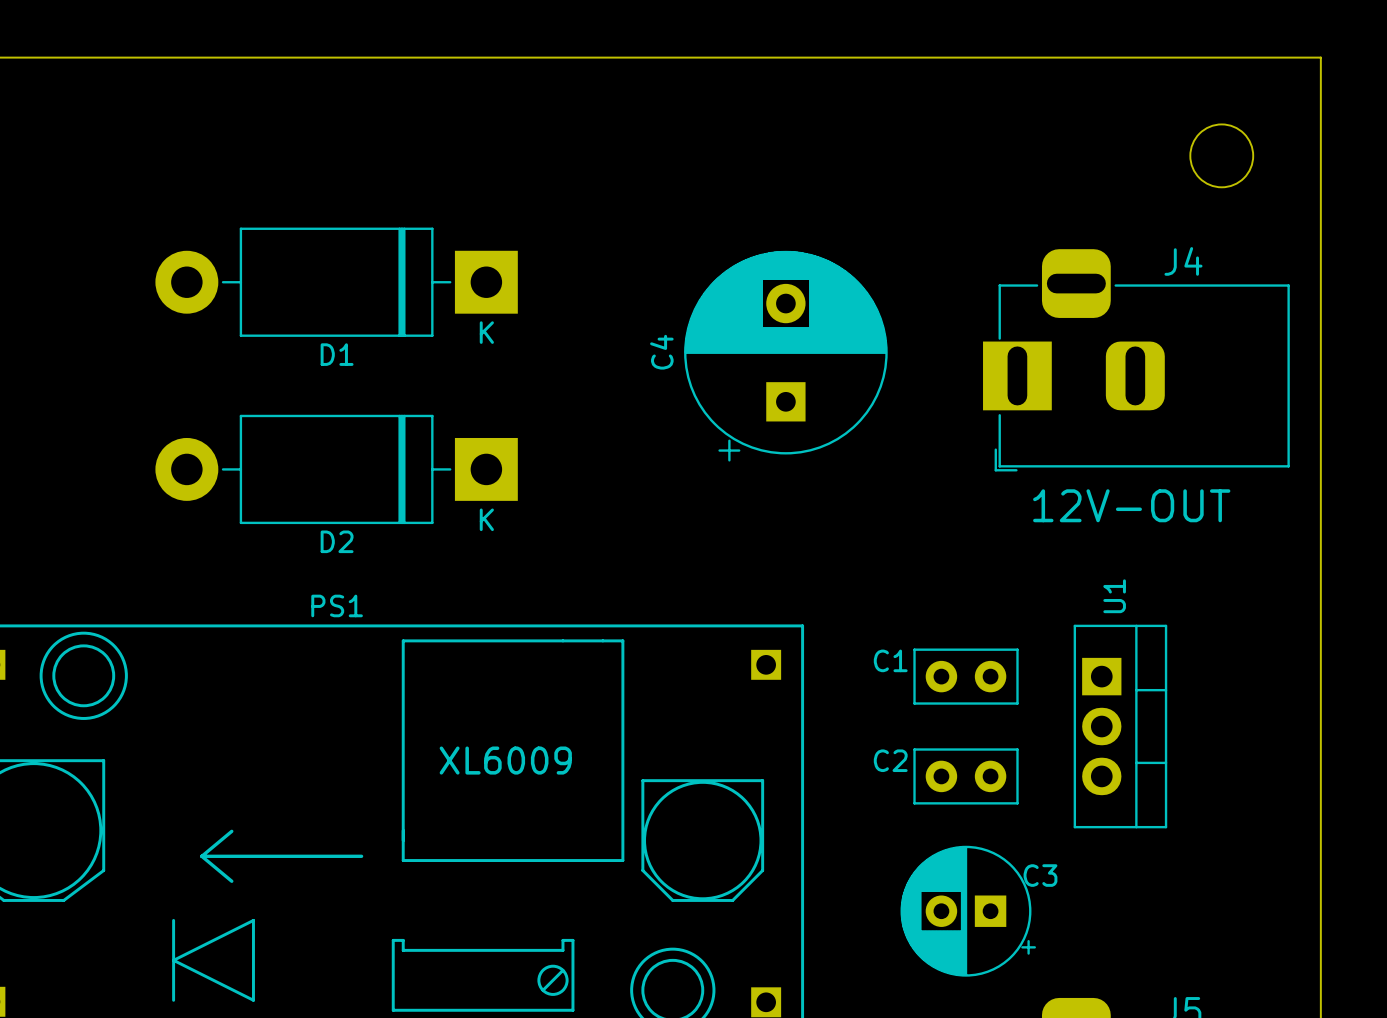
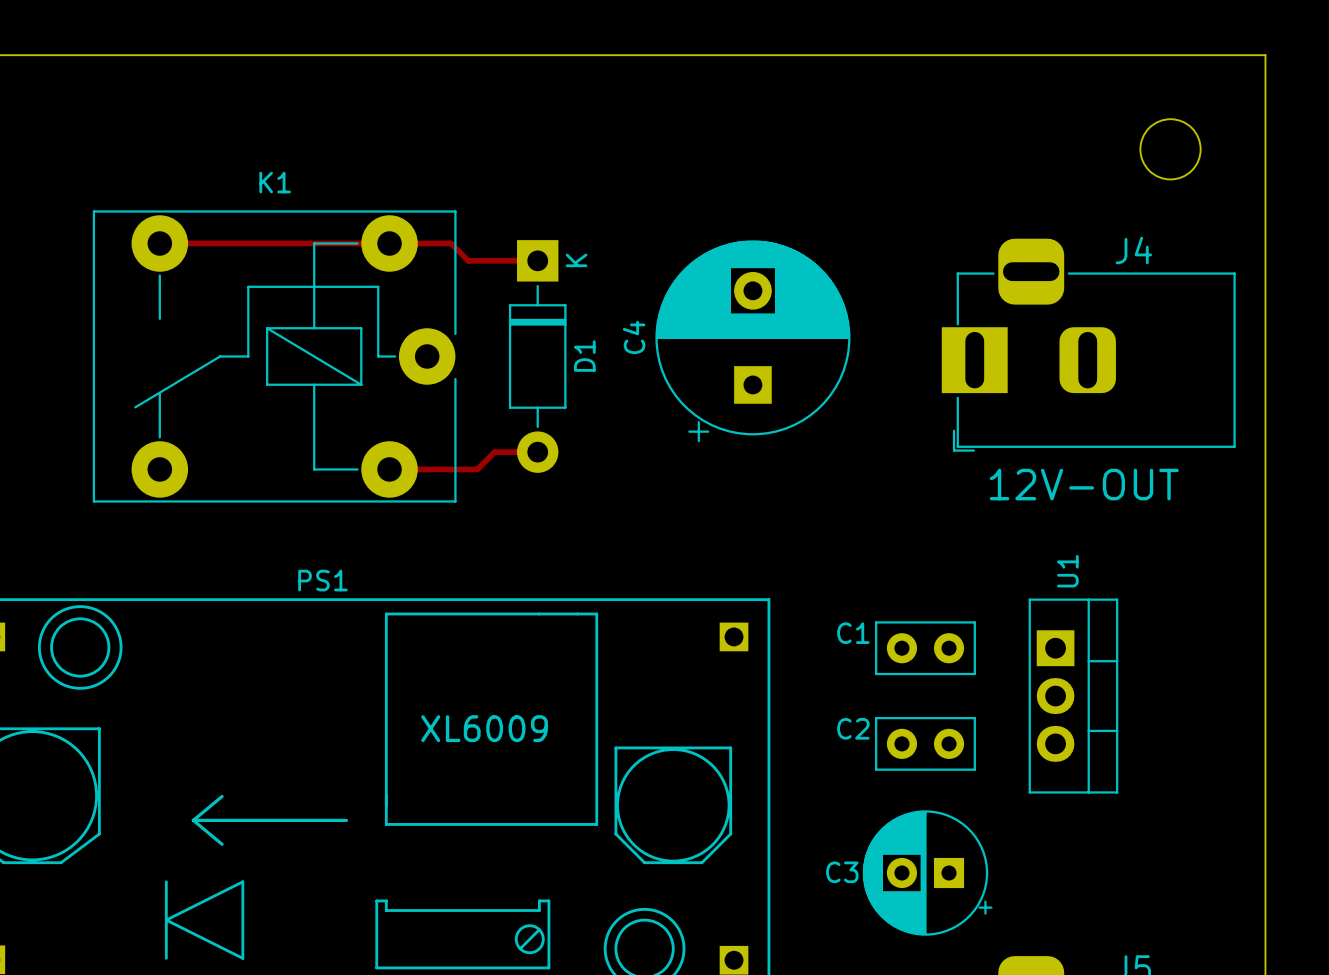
D1 footprint: [155, 227, 518, 337] -> [508, 240, 567, 473]
track: none -> (159, 243) (451, 243) (468, 260) (536, 260)
D1 name position: D1 (337, 354) -> D1 (584, 356)
K1: none -> (274, 356)
D2: (336, 469) -> none
track: none -> (536, 452) (494, 452) (477, 469) (389, 469)
C3 name position: C3 (1040, 875) -> C3 (842, 872)

